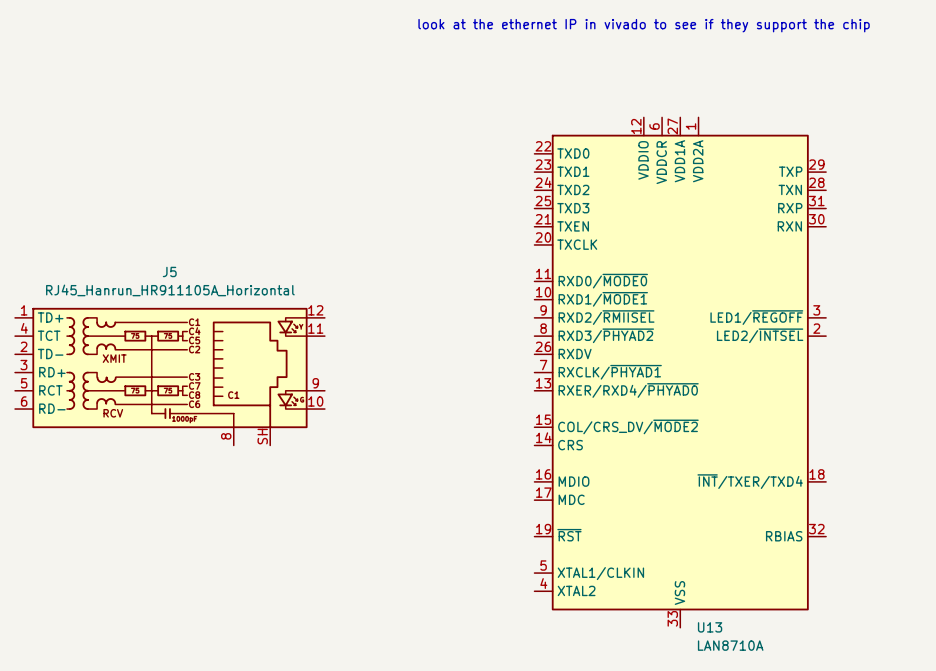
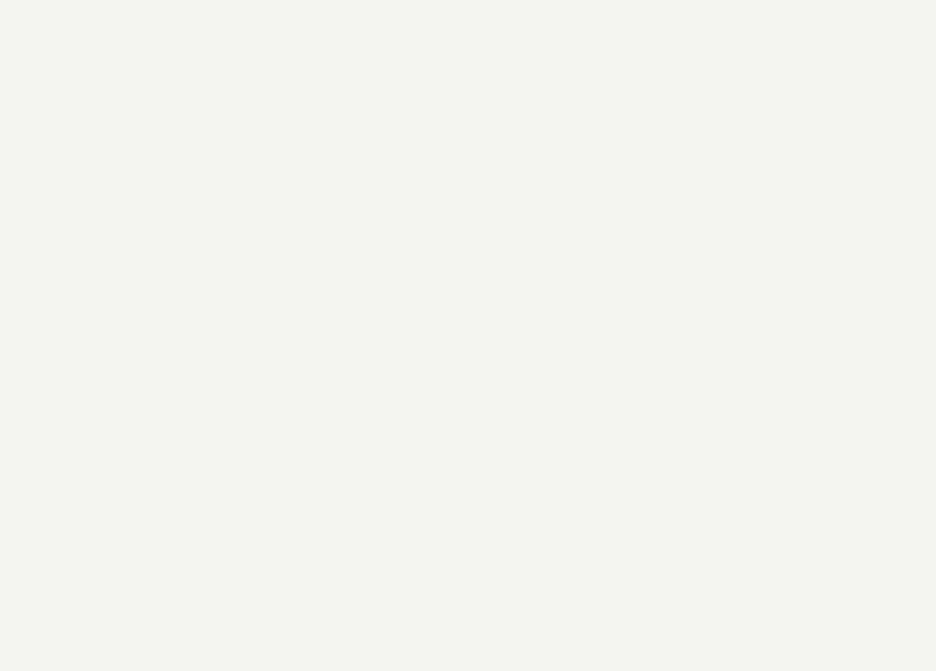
text: look at the ethernet IP in vivado to see if they support the chip (644, 25) -> none
U13: LAN8710A (680, 372) -> none
J5: RJ45_Hanrun_HR911105A_Horizontal (169, 376) -> none

